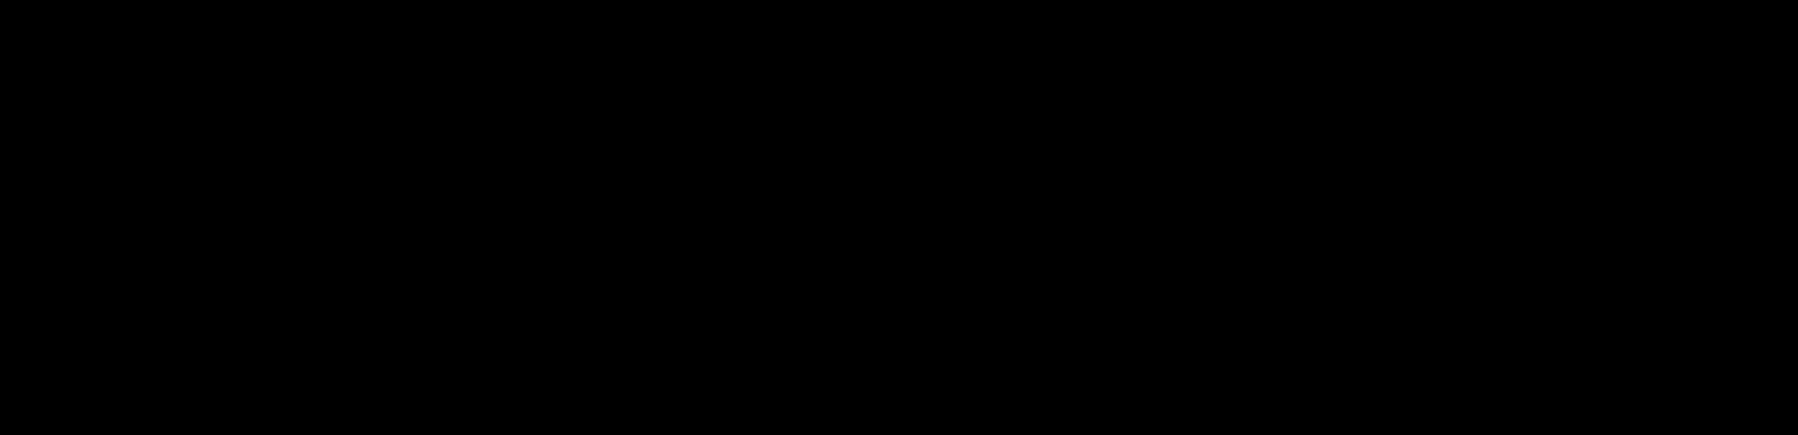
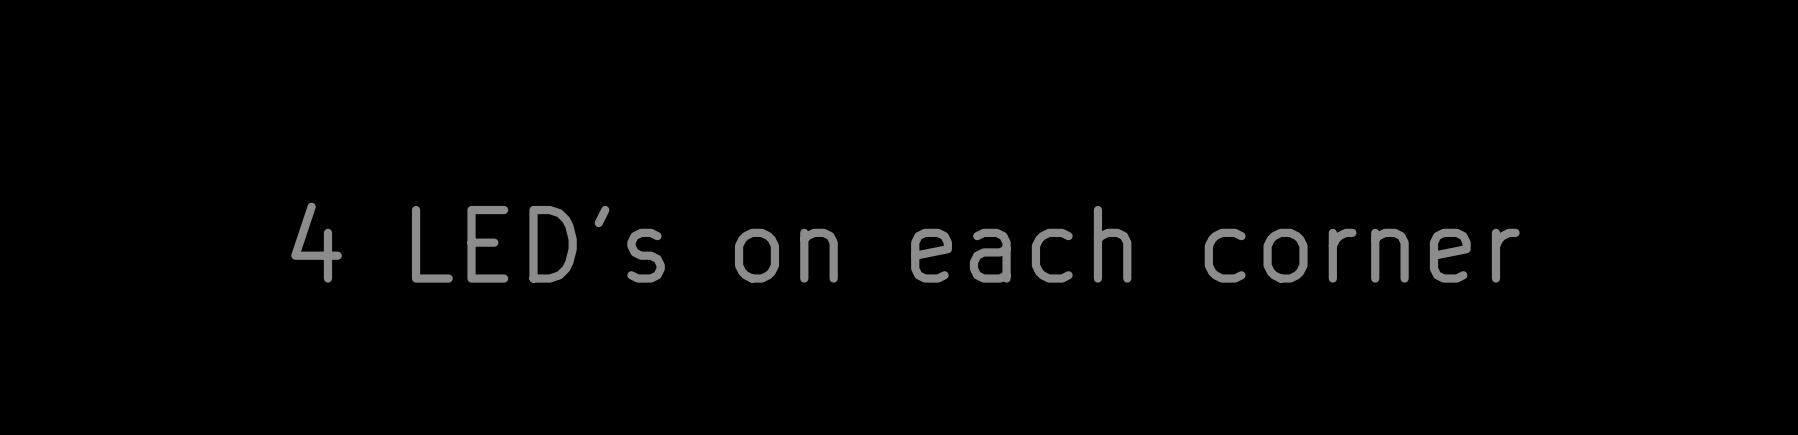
text: none -> 4 LED's on each corner (905, 242)

